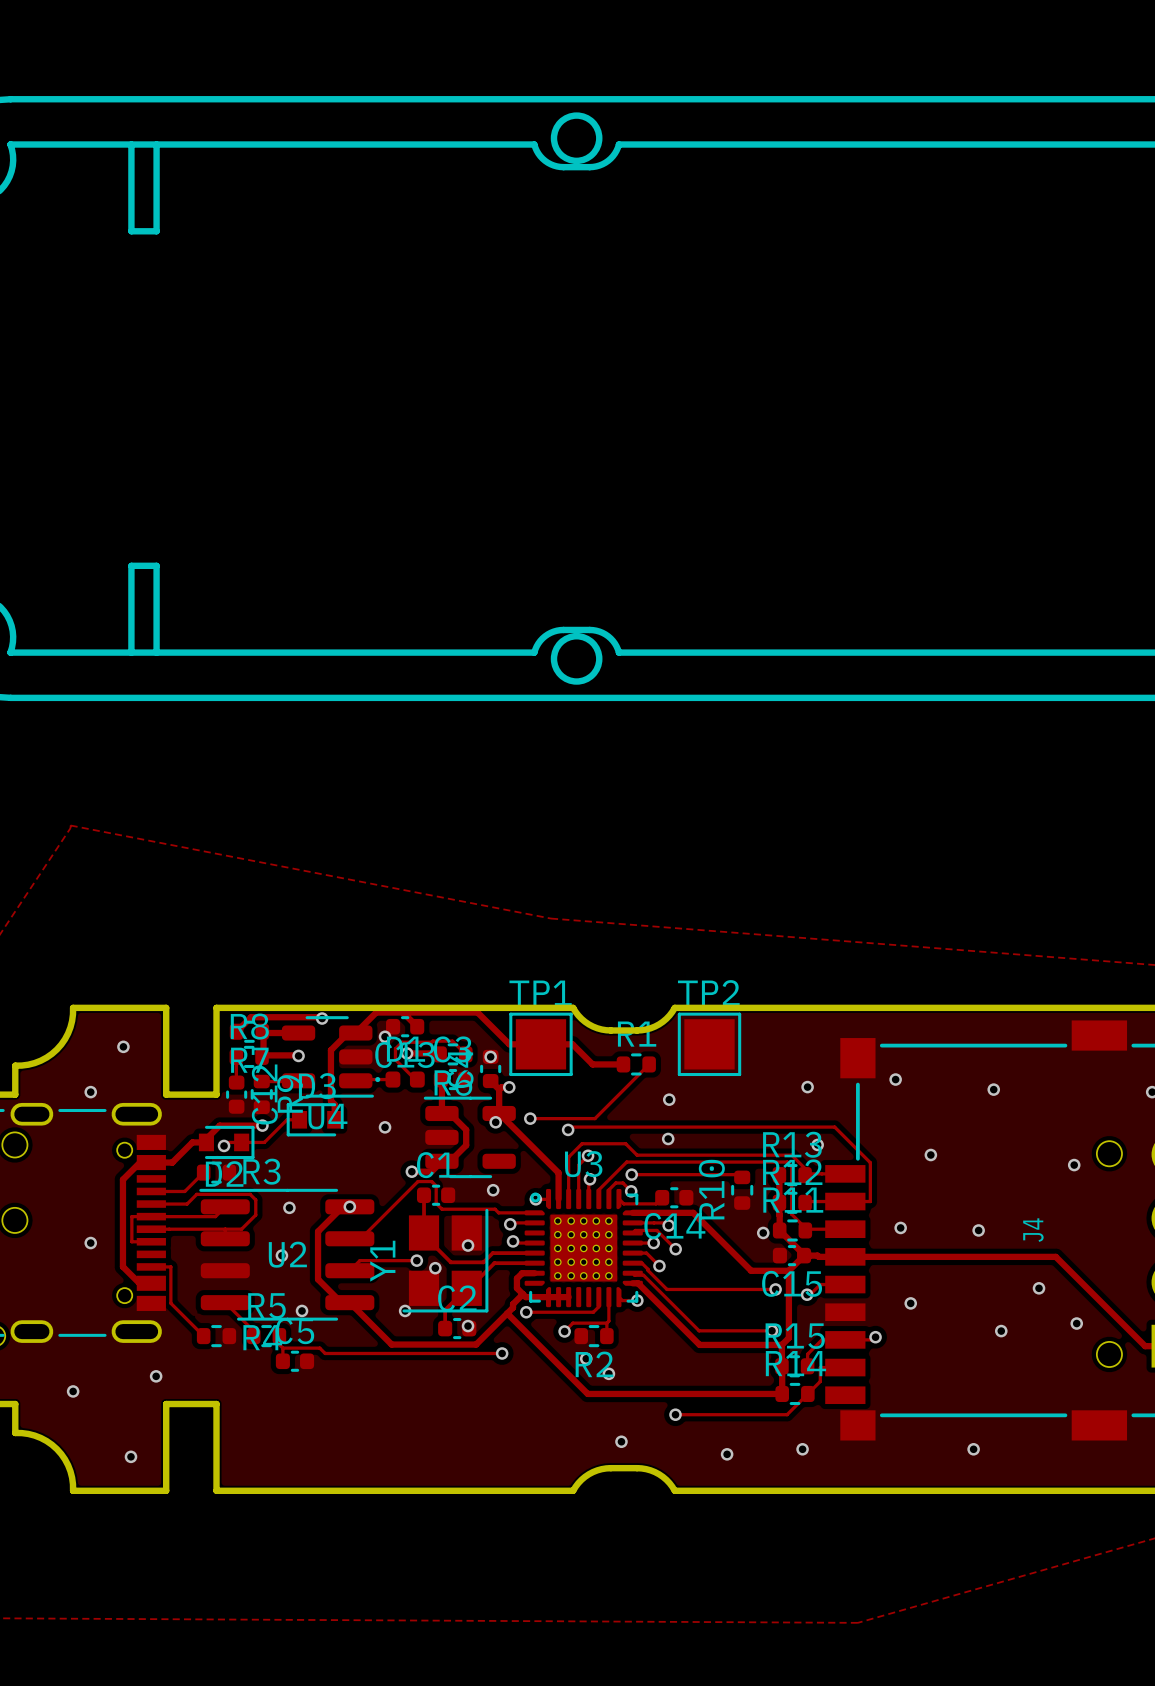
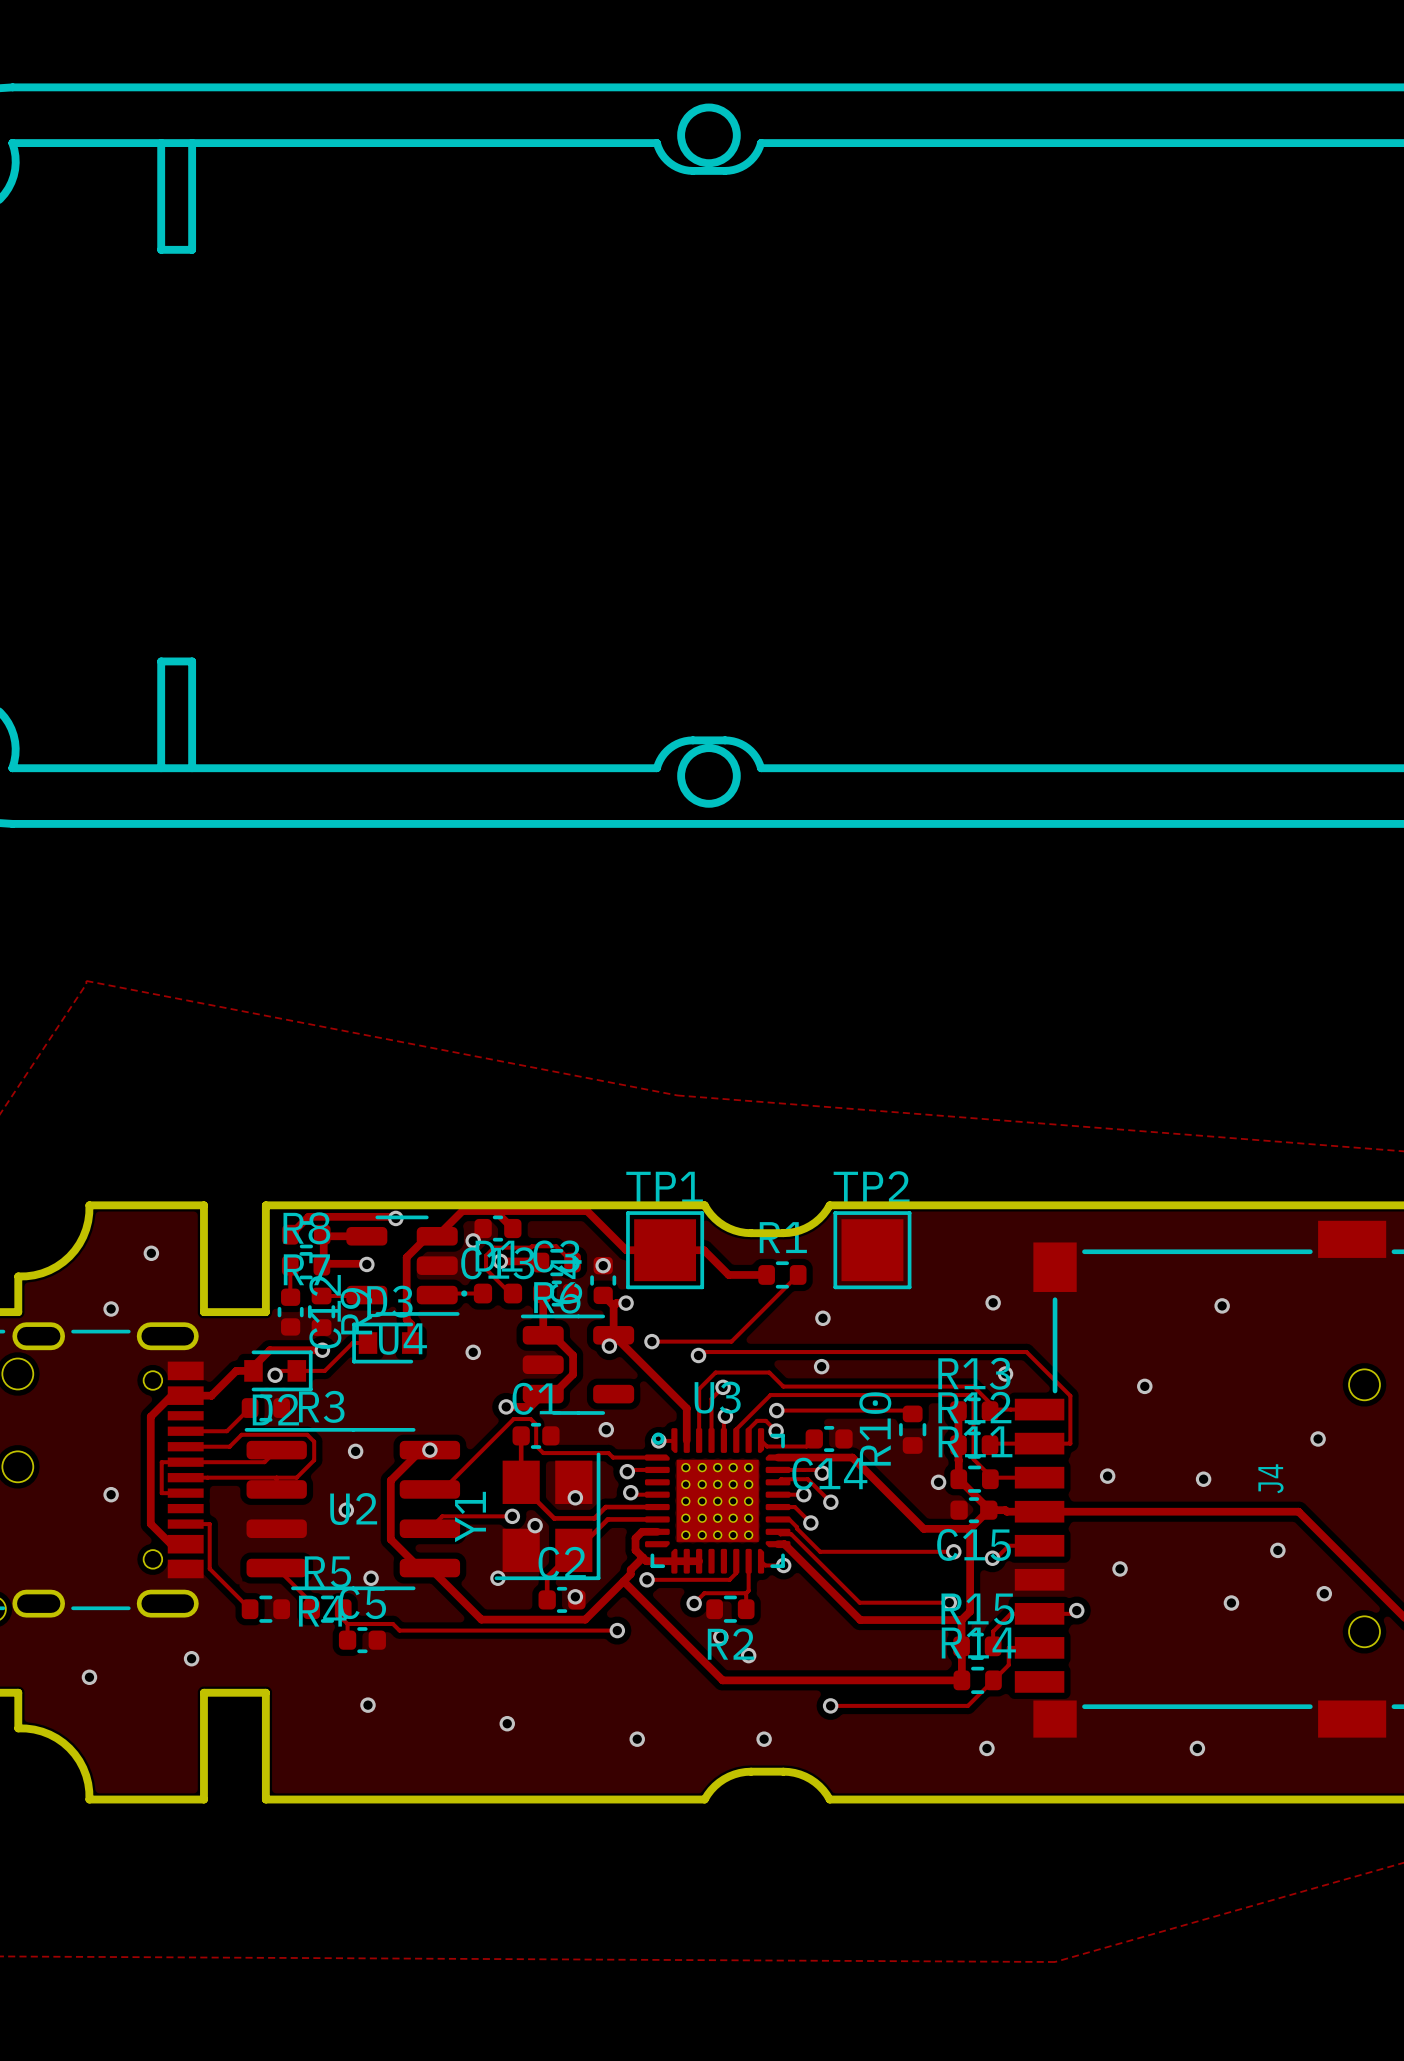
via: (895, 1079) -> none
via position: (1074, 1165) -> (1318, 1438)
via: none -> (367, 1705)
via: none -> (507, 1723)
via: none -> (637, 1739)
via: (727, 1454) -> none
via: (130, 1456) -> none

